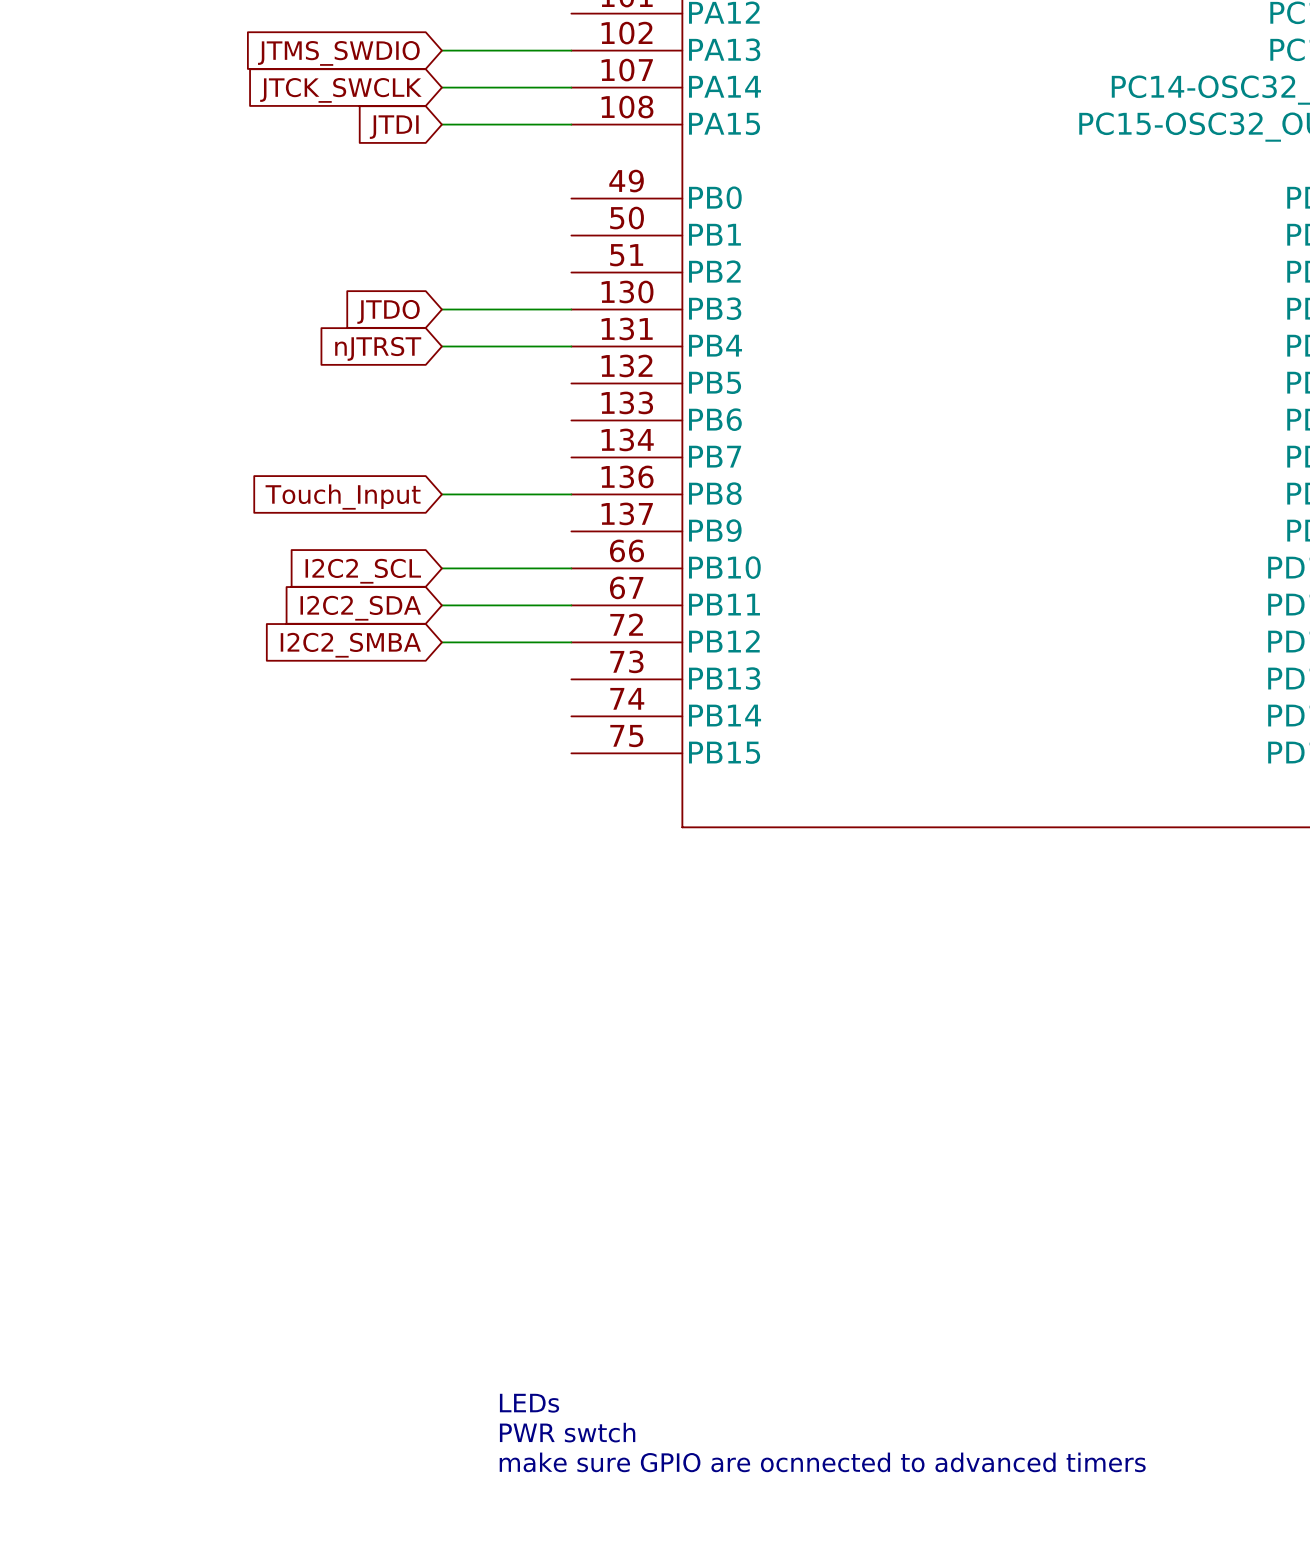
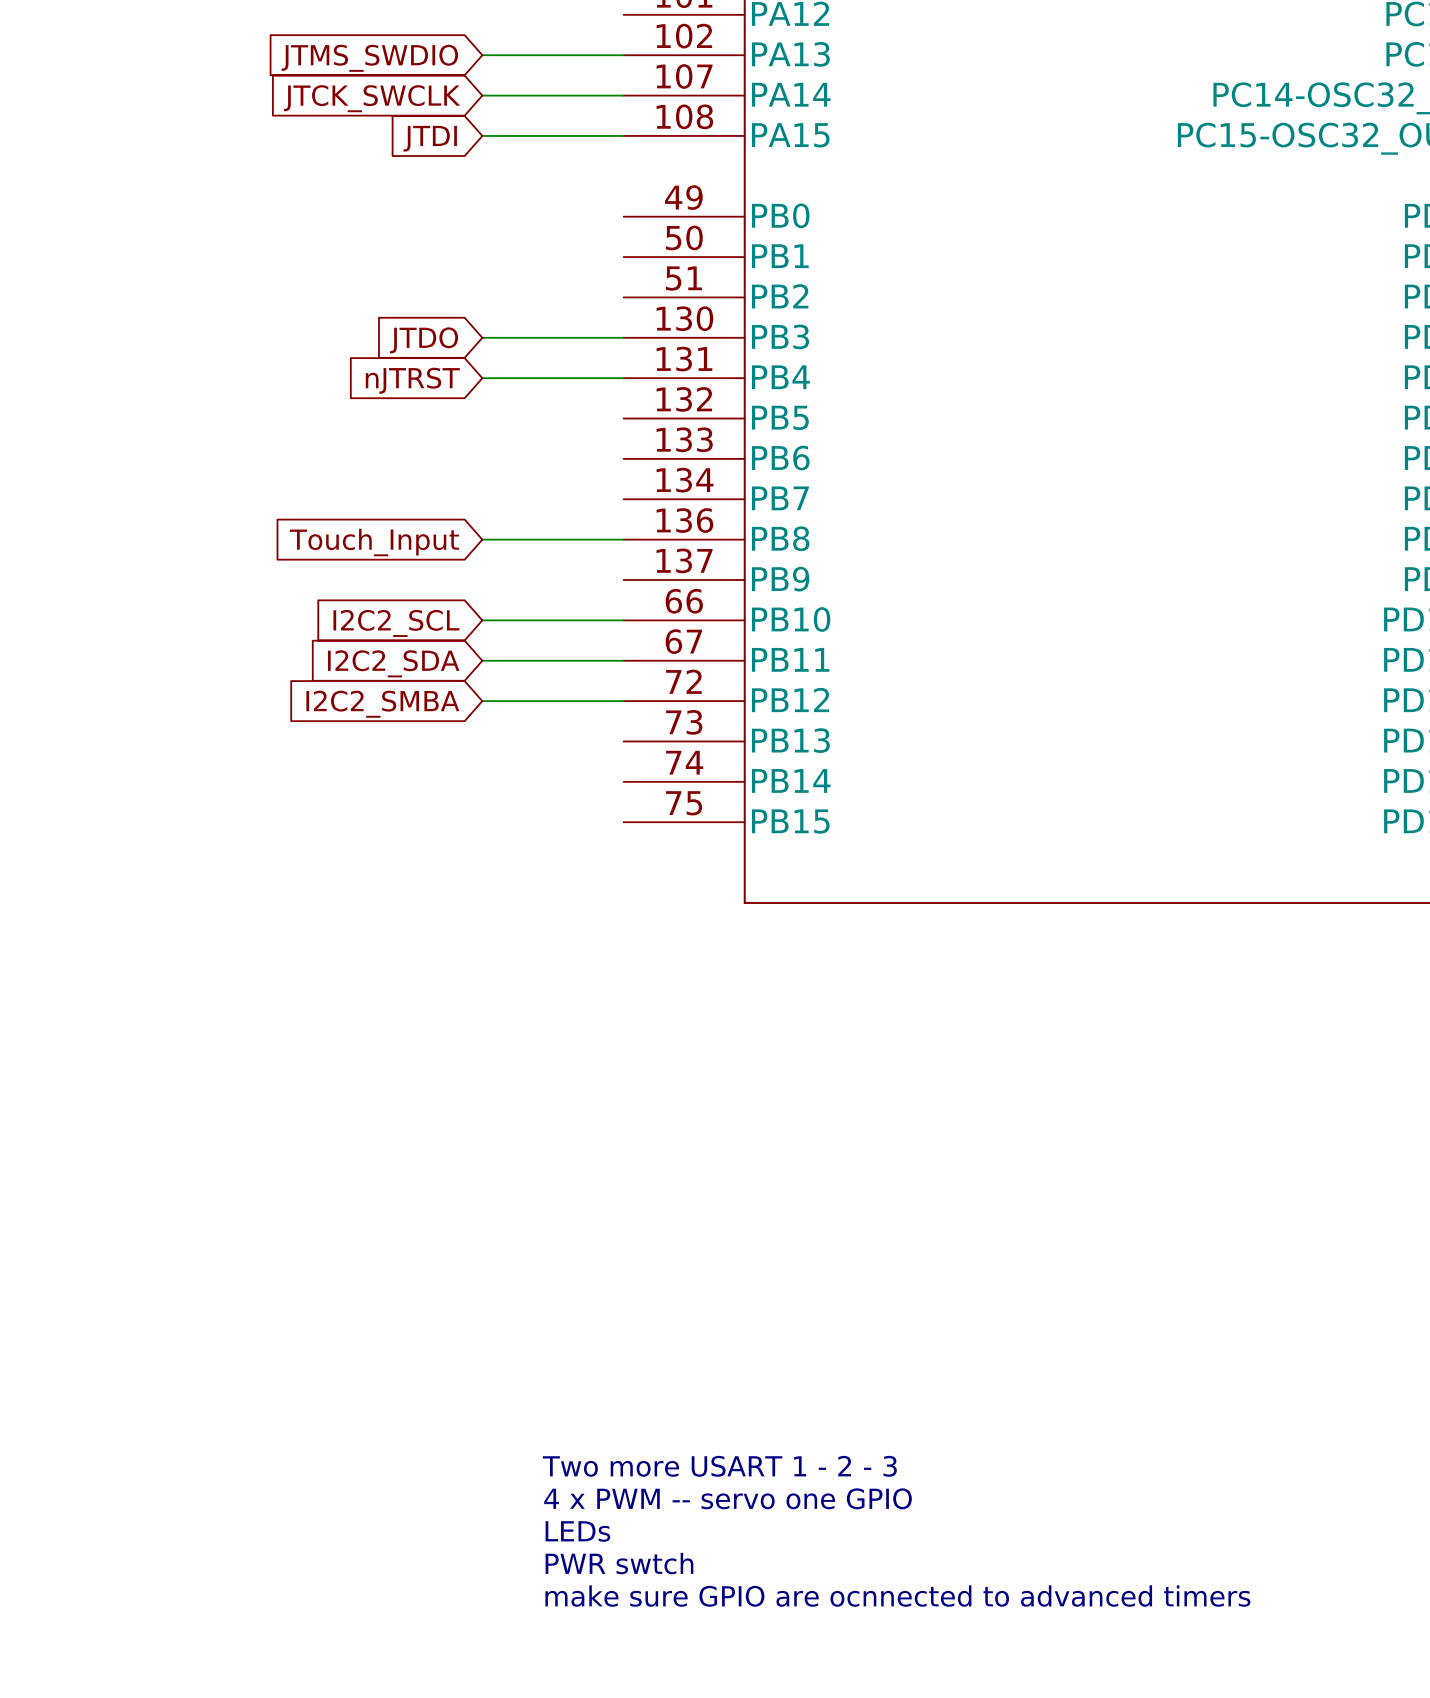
text: none -> Two more USART 1 - 2 - 3 (719, 1466)
text: none -> 4 x PWM -- servo one GPIO (728, 1498)

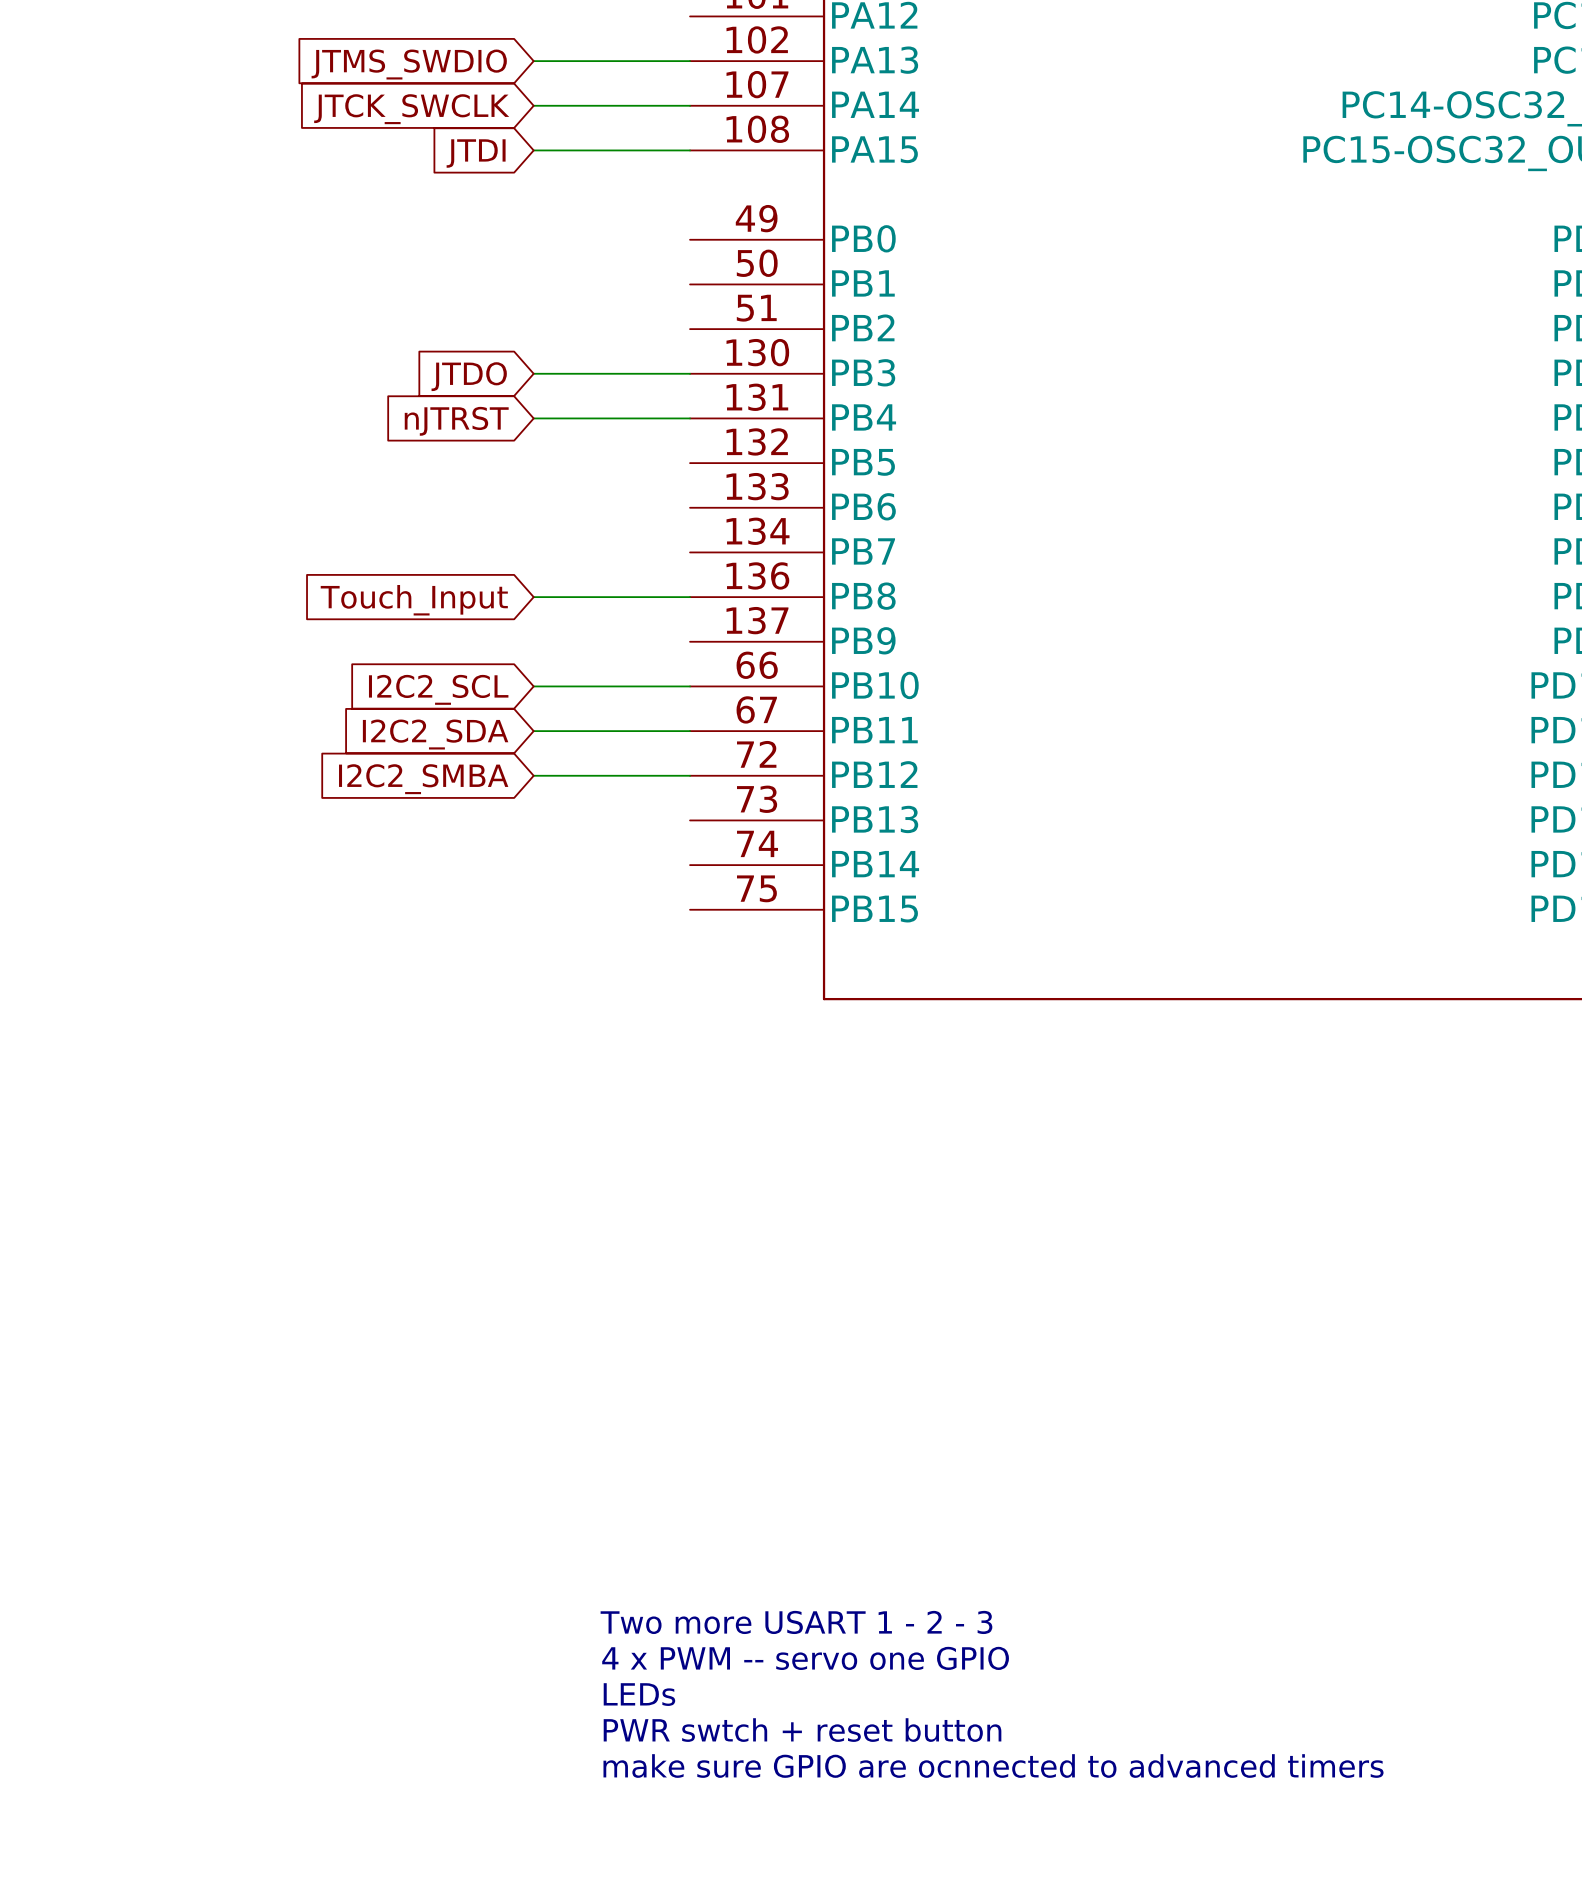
text: PWR swtch (619, 1563) -> PWR swtch + reset button (802, 1730)

